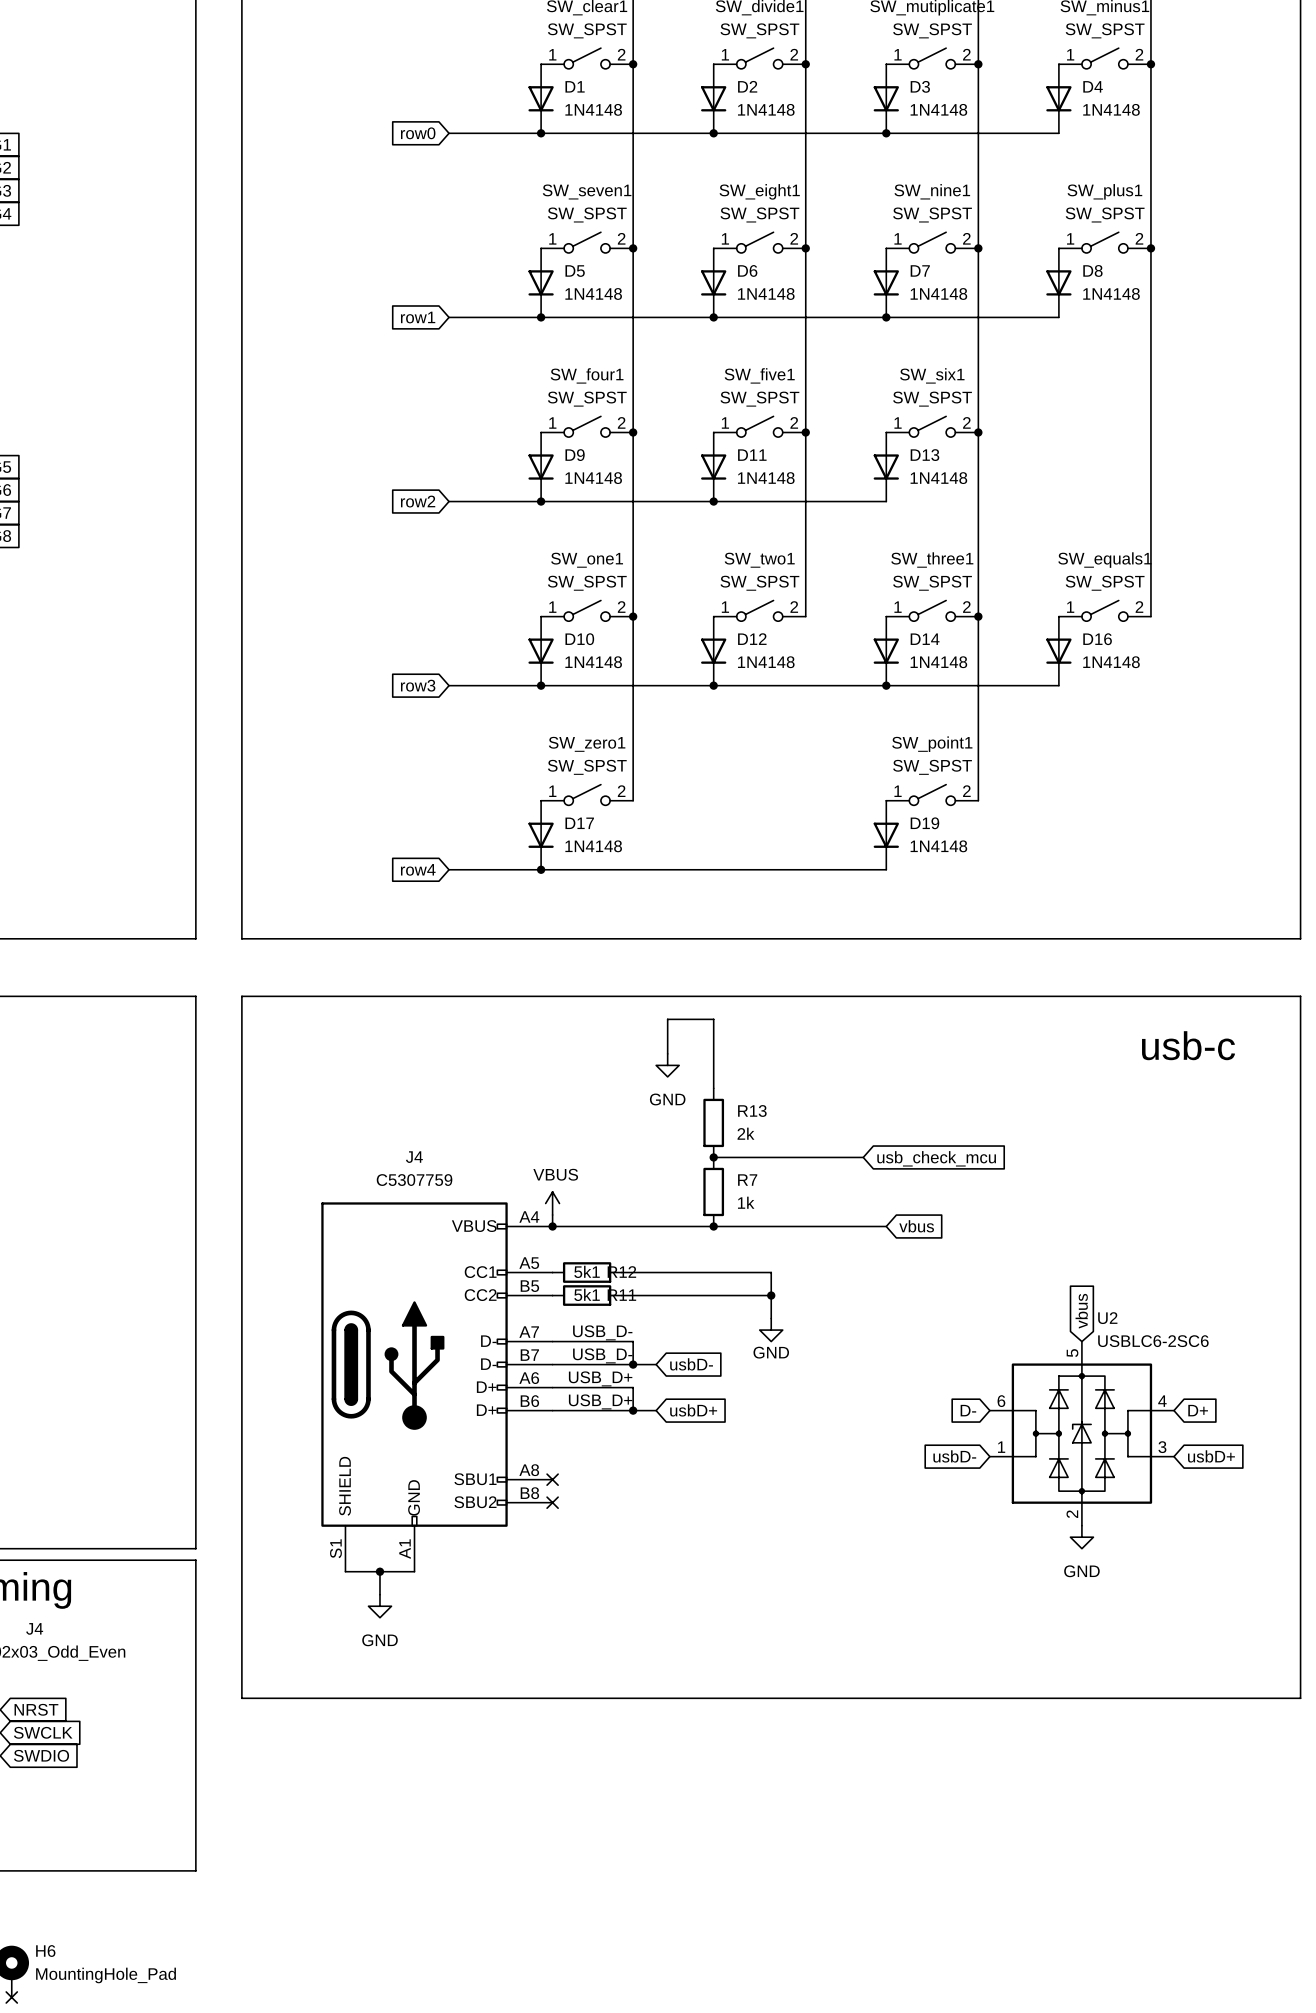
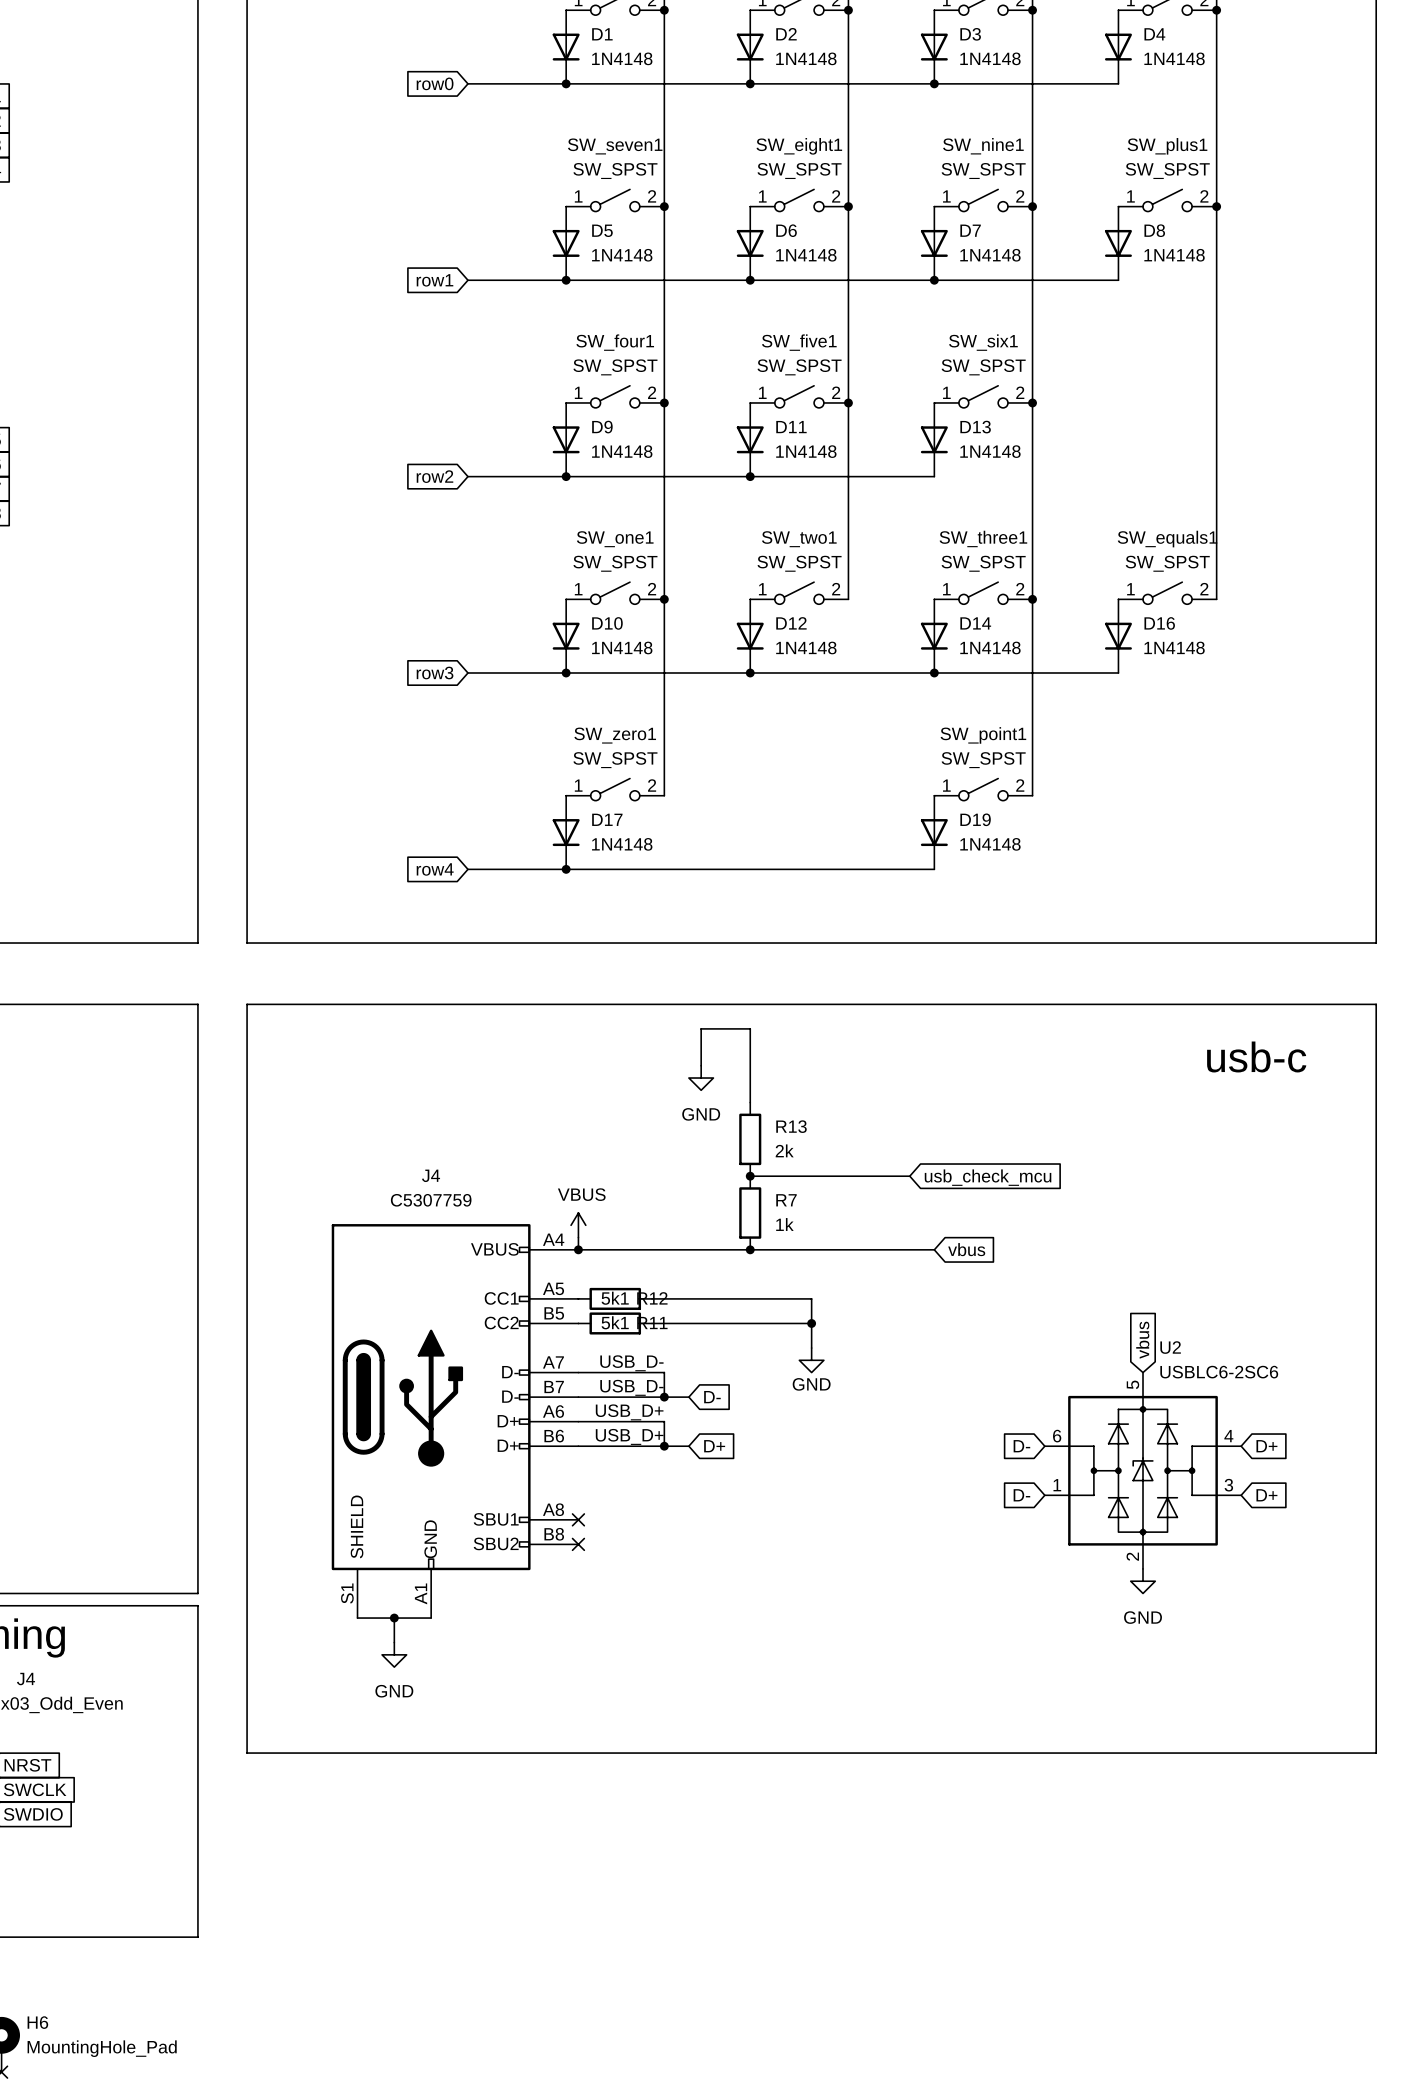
global label: usbD- (691, 1364) -> D- (712, 1397)
global label: usbD+ (693, 1410) -> D+ (714, 1446)
global label: usbD- (954, 1456) -> D- (1021, 1495)
global label: usbD+ (1211, 1456) -> D+ (1266, 1495)

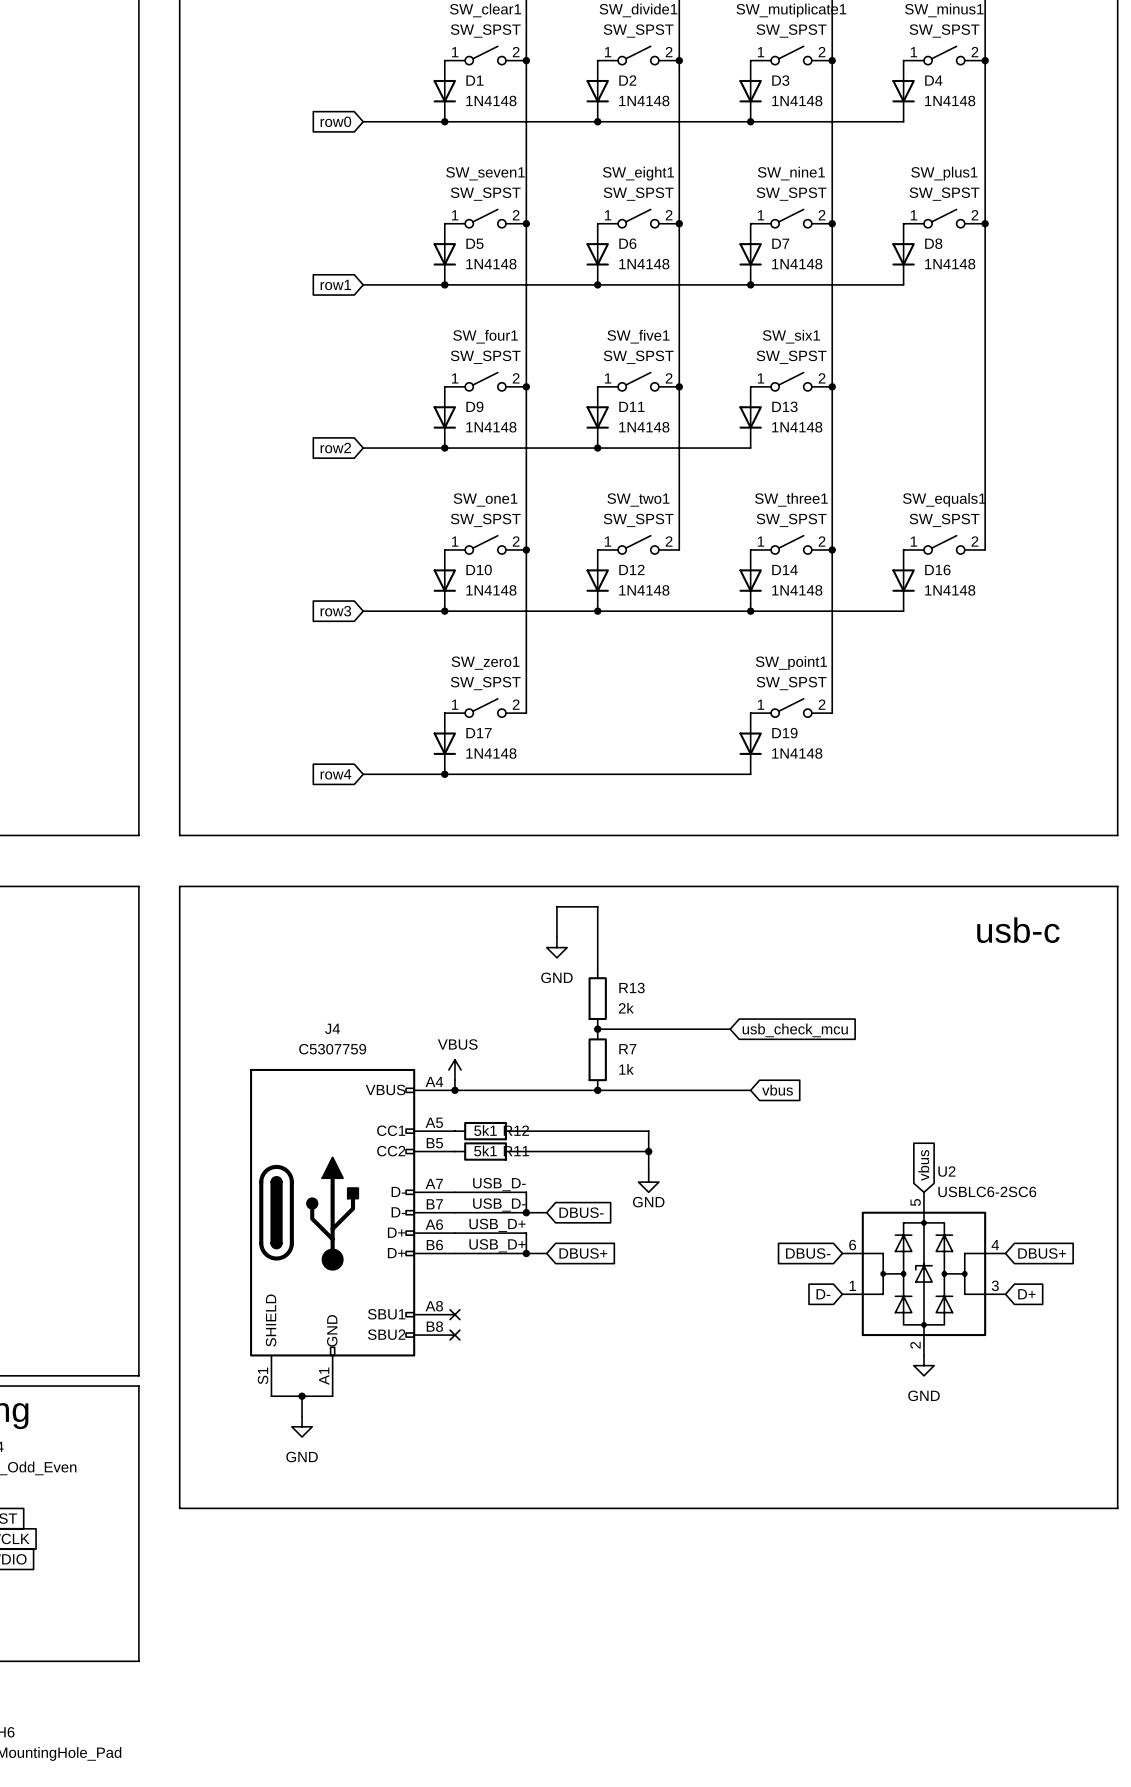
global label: D- (712, 1397) -> DBUS- (581, 1212)
global label: D+ (714, 1446) -> DBUS+ (583, 1253)
global label: D- (1021, 1446) -> DBUS- (808, 1253)
global label: D+ (1266, 1446) -> DBUS+ (1042, 1253)

